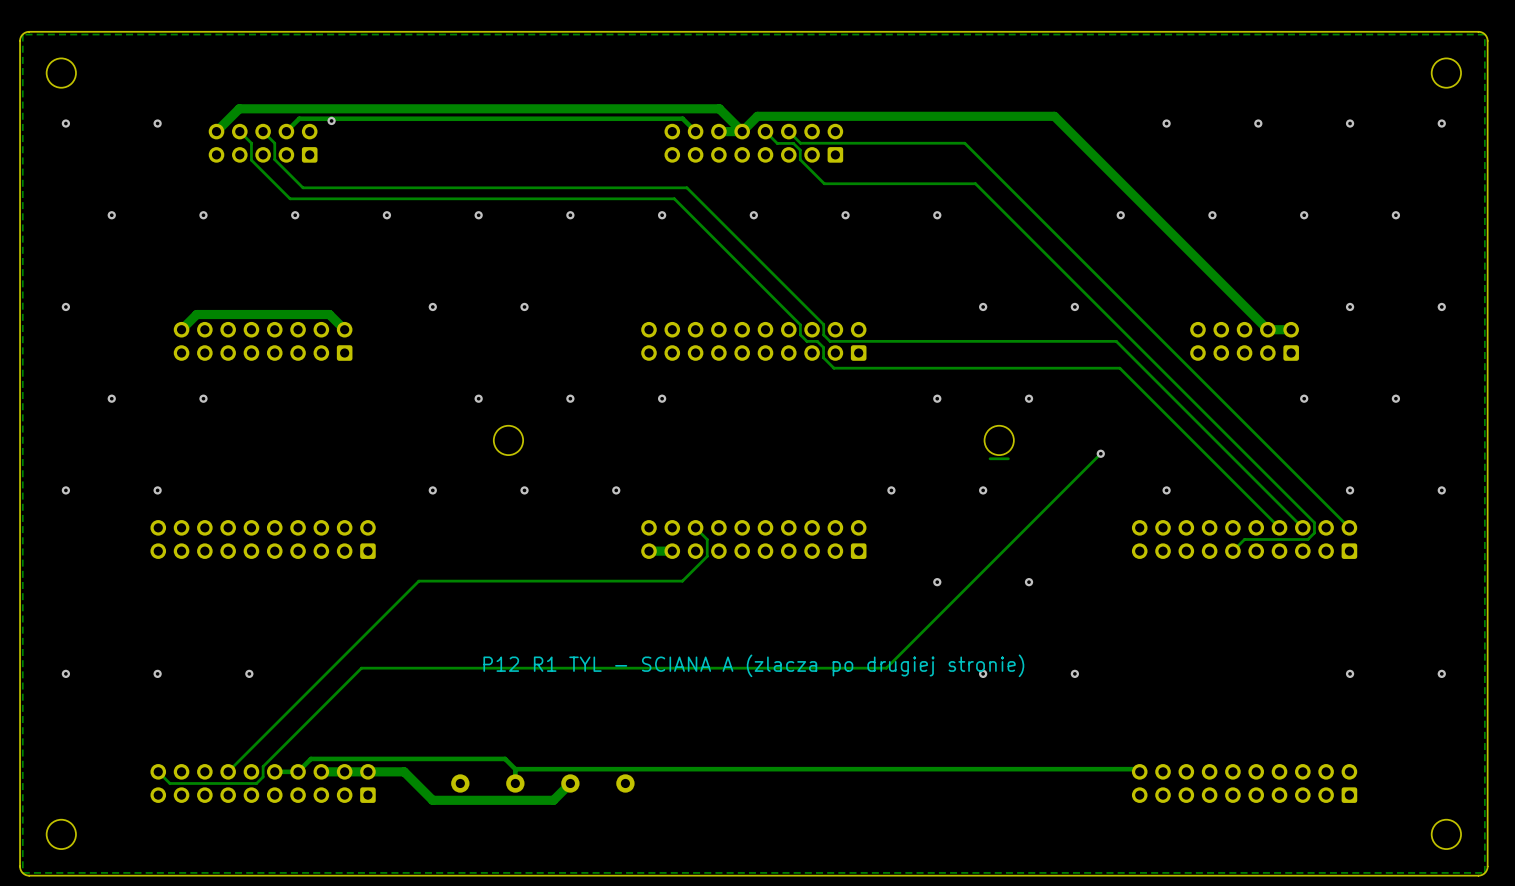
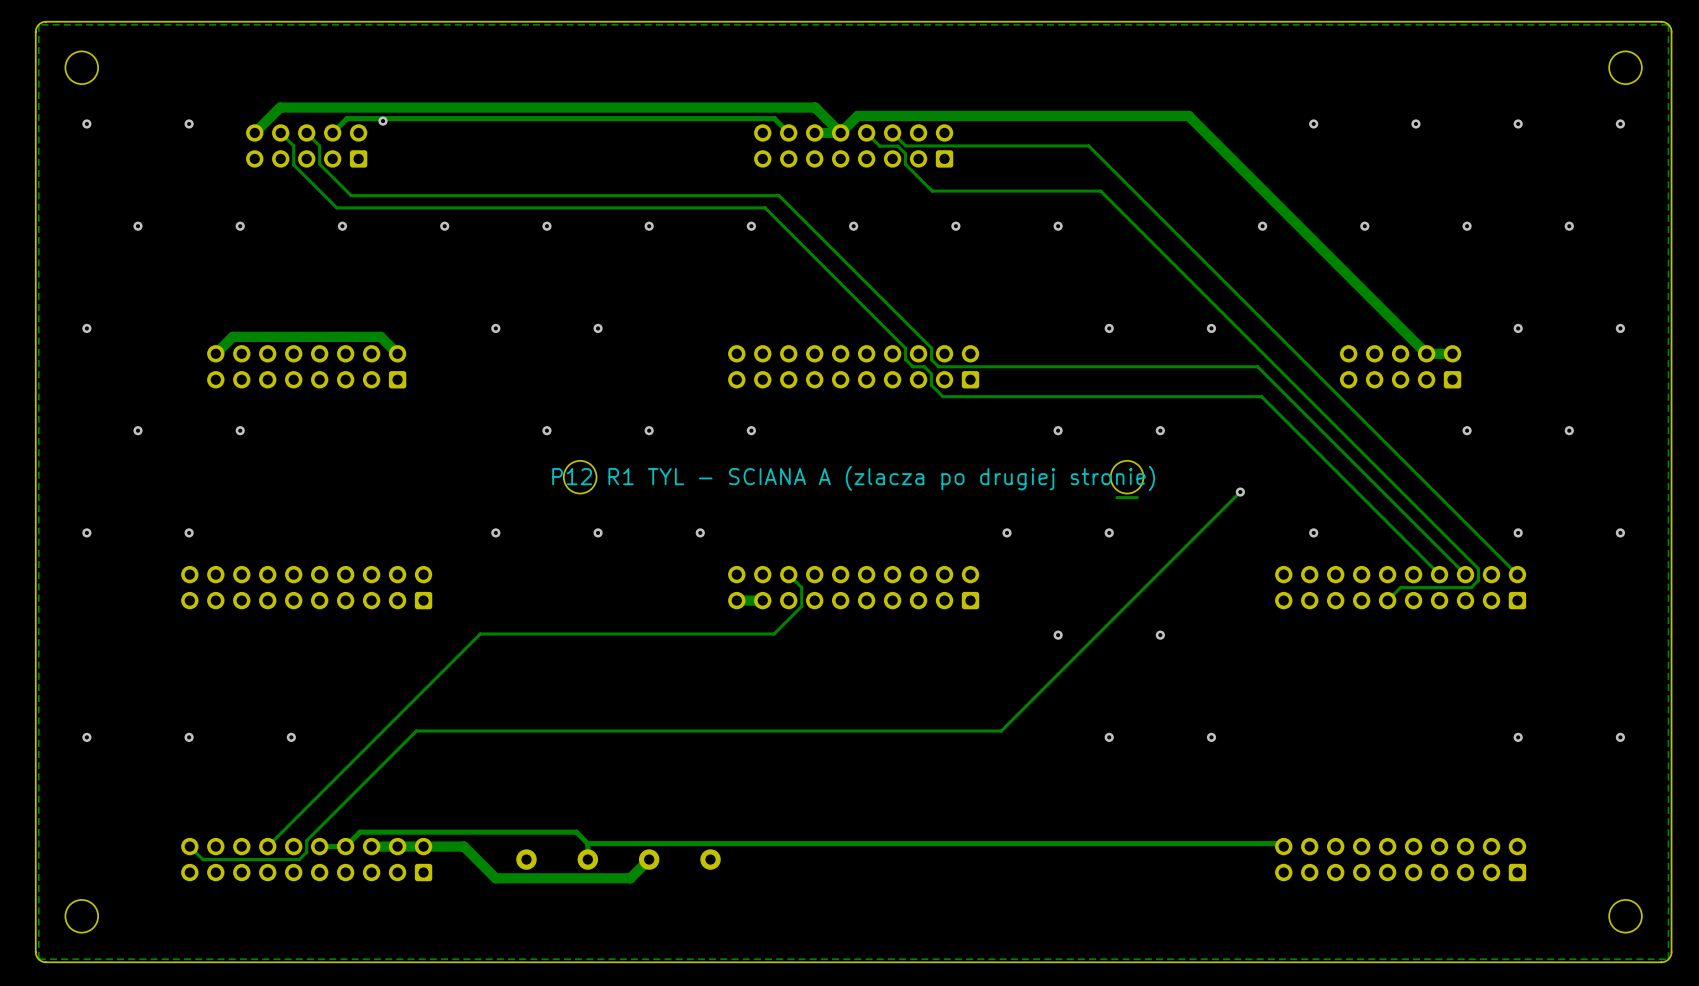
text position: P12 R1 TYL - SCIANA A (zlacza po drugiej stronie) (753, 665) -> P12 R1 TYL - SCIANA A (zlacza po drugiej stronie) (853, 478)

